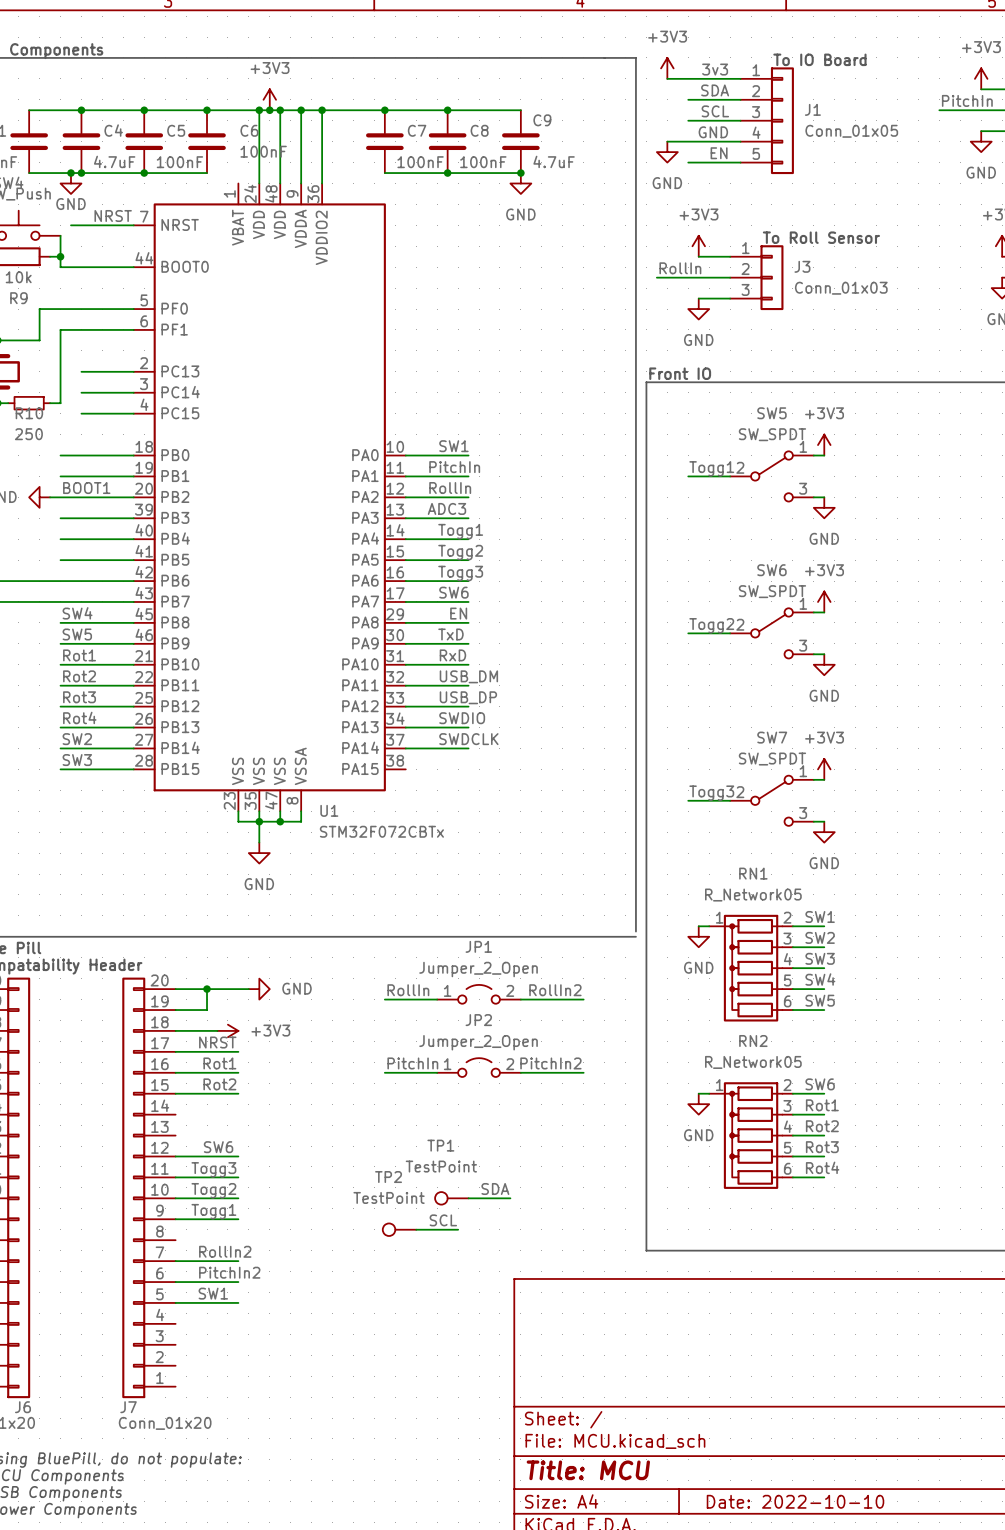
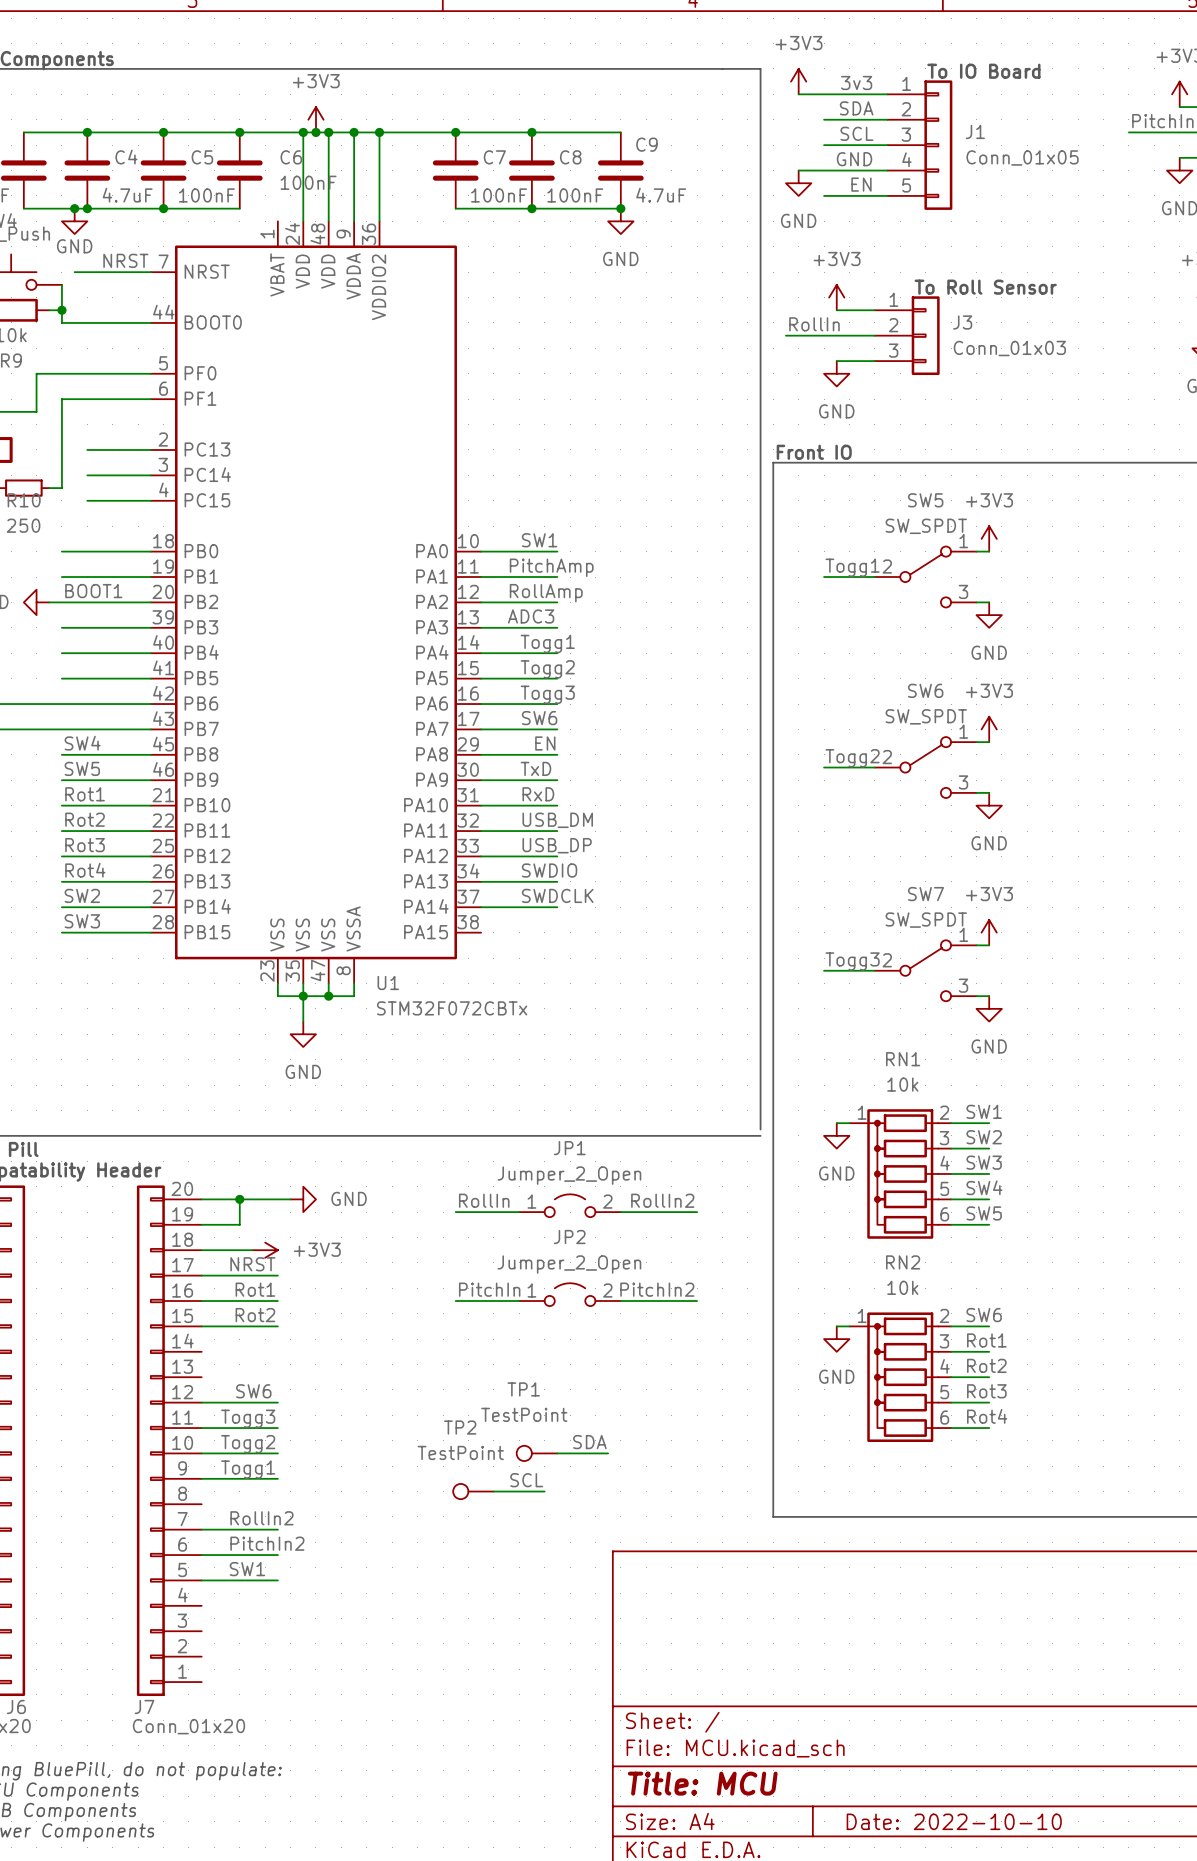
label: PitchIn (454, 467) -> PitchAmp (551, 567)
label: RollIn (450, 488) -> RollAmp (546, 593)
RN1 value: R_Network05 (753, 895) -> 10k (902, 1084)
RN2 value: R_Network05 (753, 1062) -> 10k (902, 1287)

